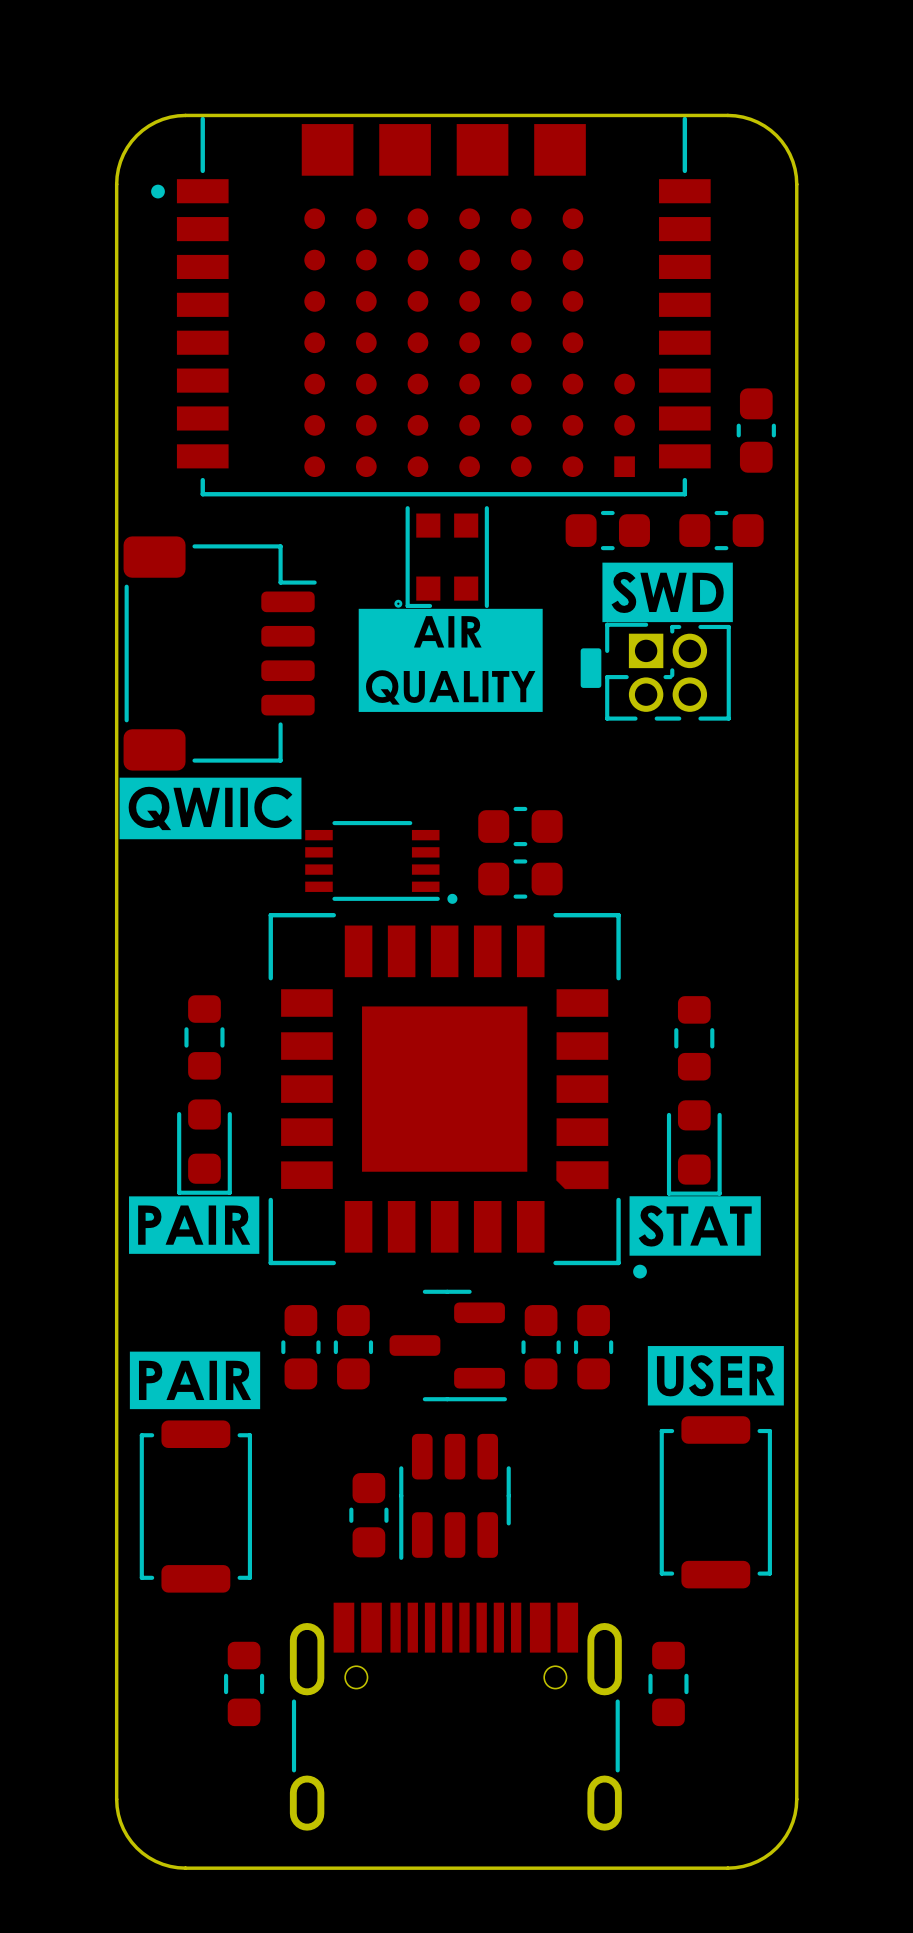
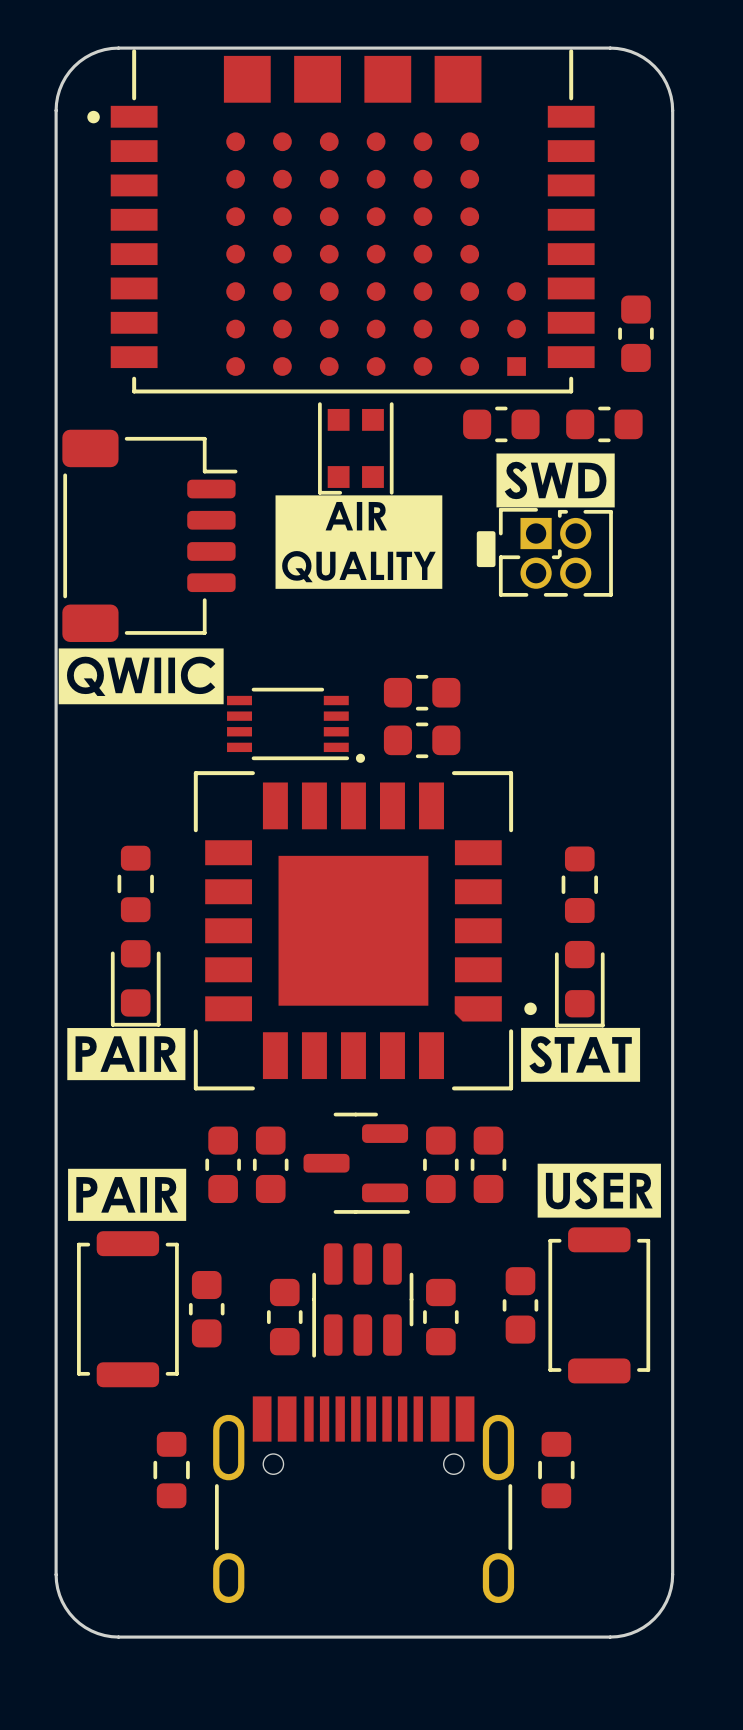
drawing: [394, 599, 403, 608] -> none
part footprint: [268, 913, 647, 1279] -> [193, 771, 537, 1091]
part: none -> (520, 1305)
part: none -> (206, 1309)
part: none -> (440, 1317)

